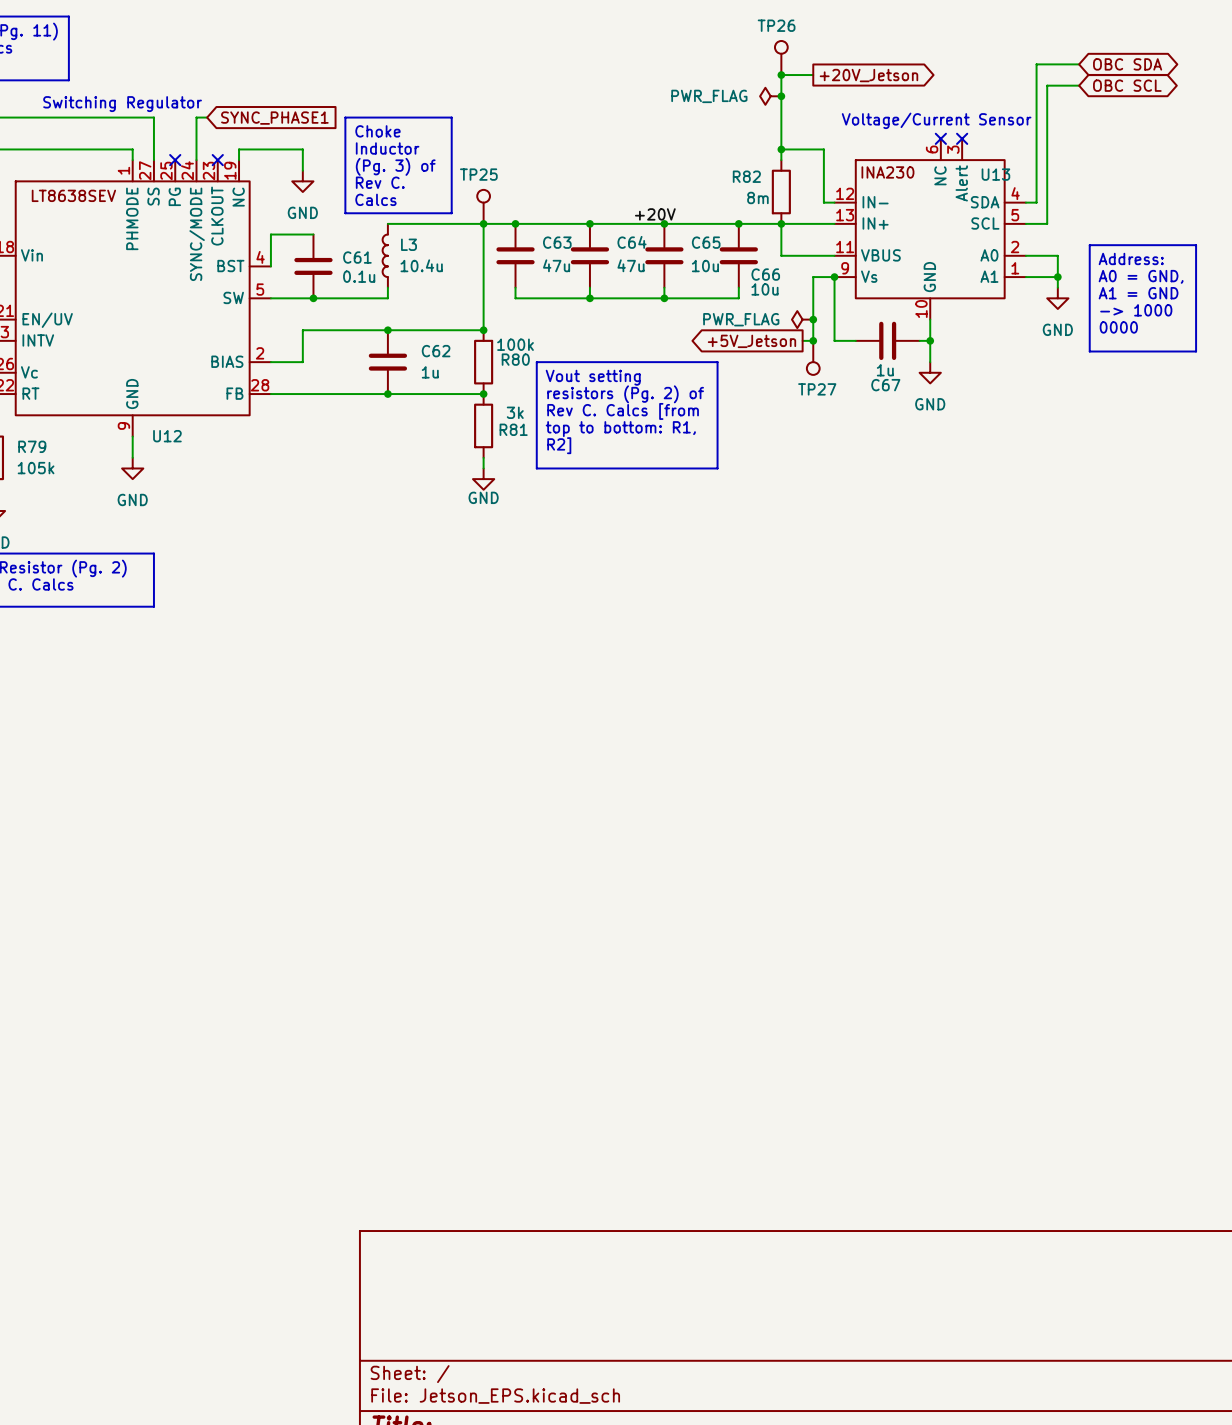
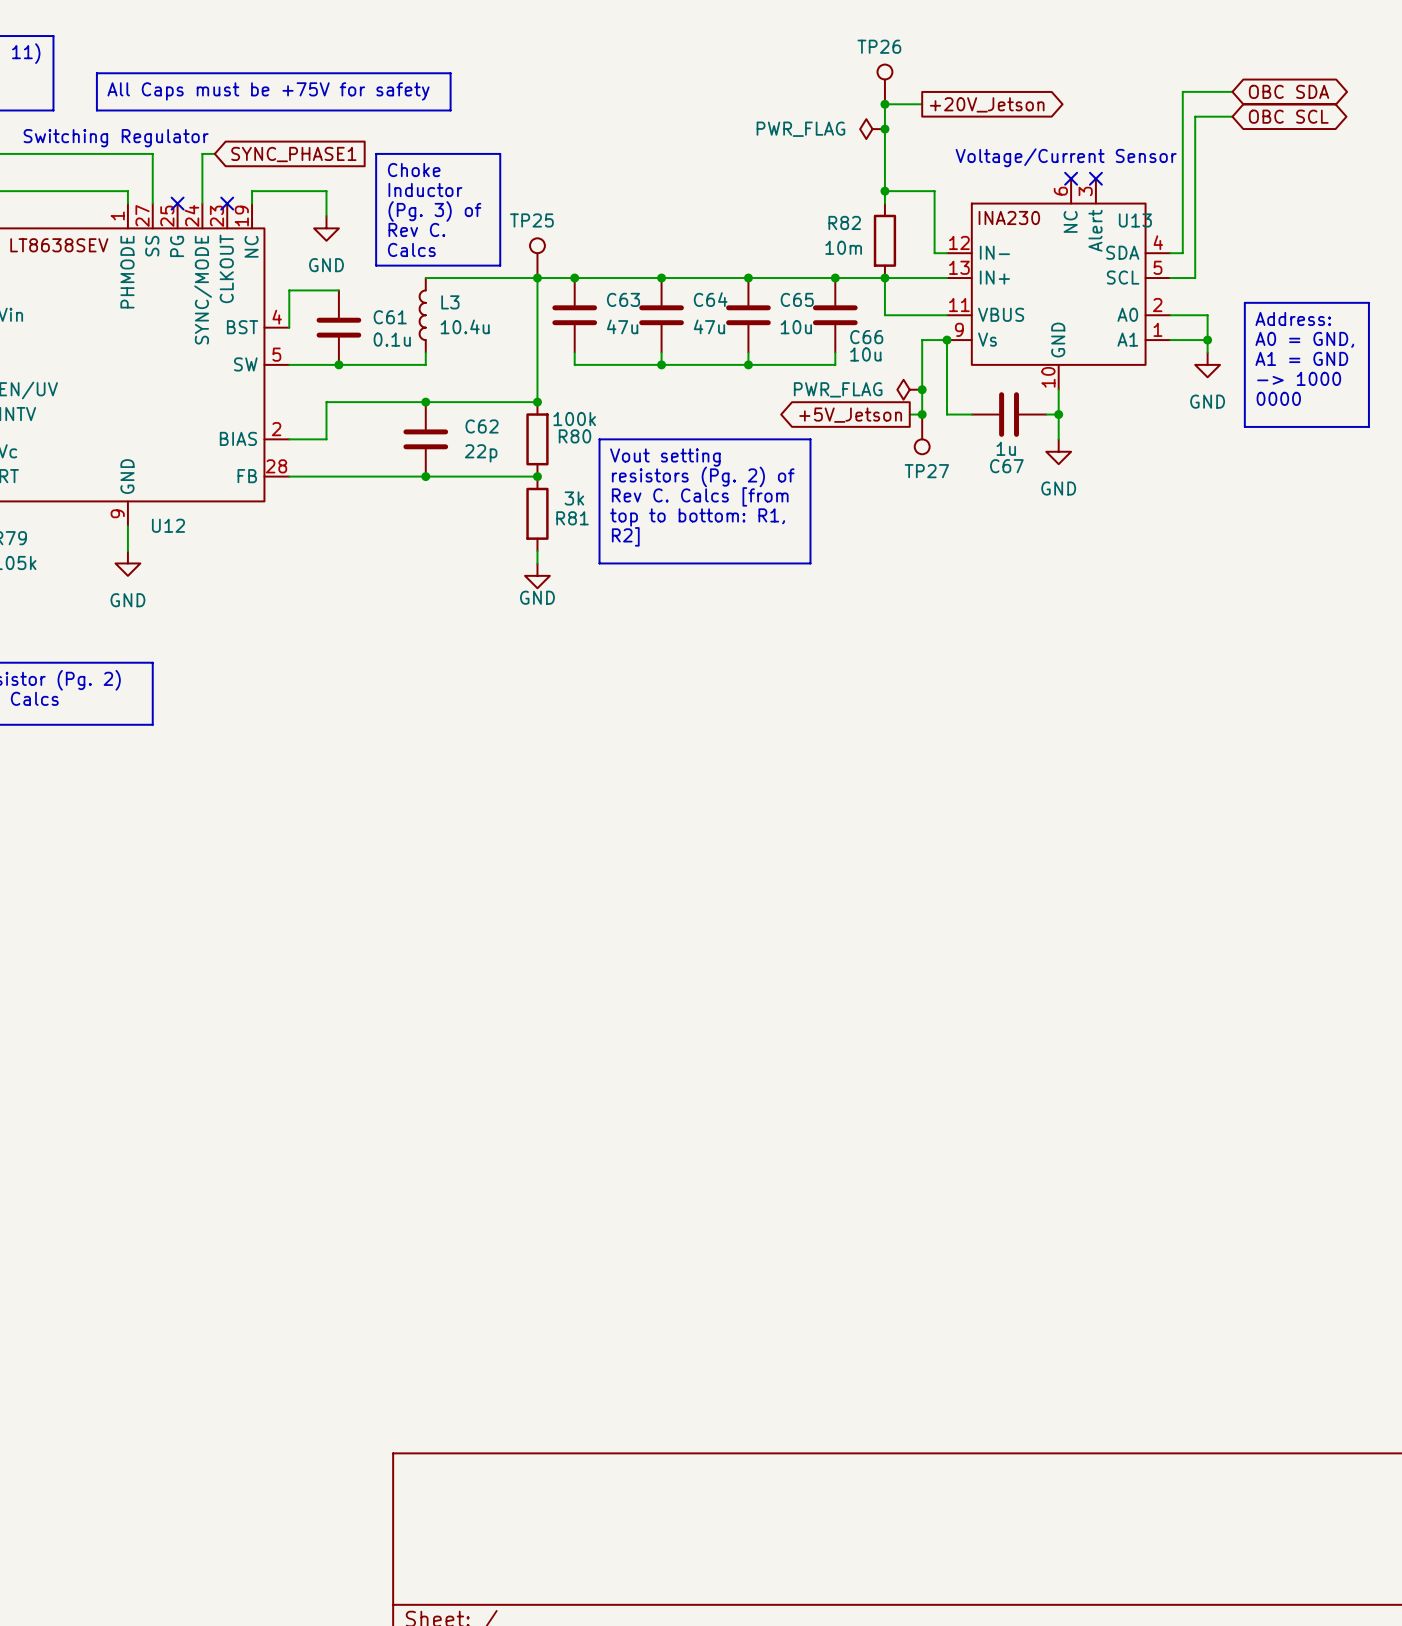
line: none -> (96, 73) (450, 73) (450, 110) (96, 110) (96, 73)
text: none -> All Caps must be +75V for safety (268, 91)
R82 value: 8m (757, 197) -> 10m (843, 247)
label: +20V (655, 214) -> none
C62 value: 1u (430, 372) -> 22p (481, 453)

